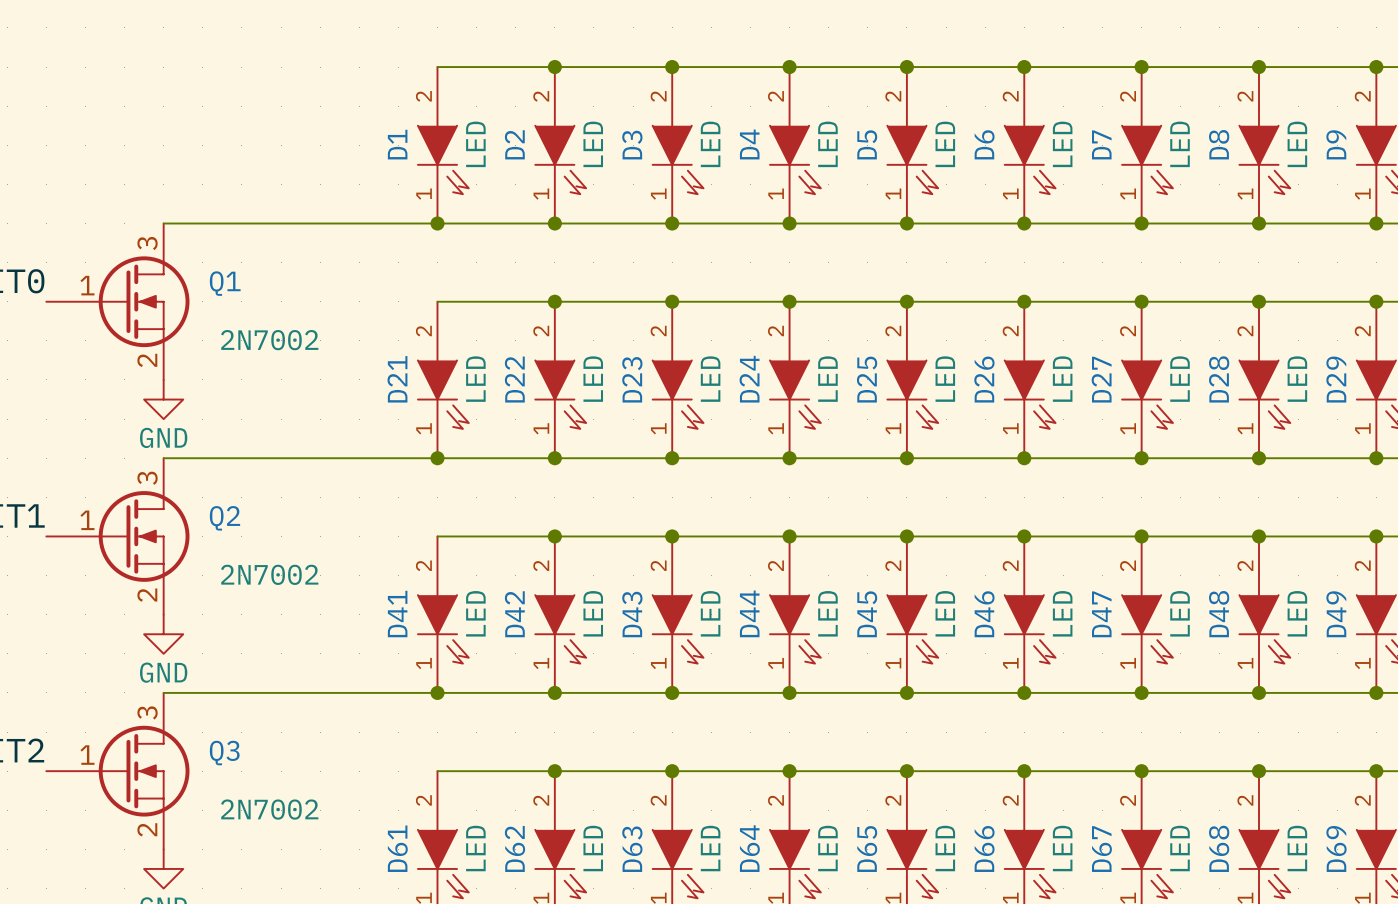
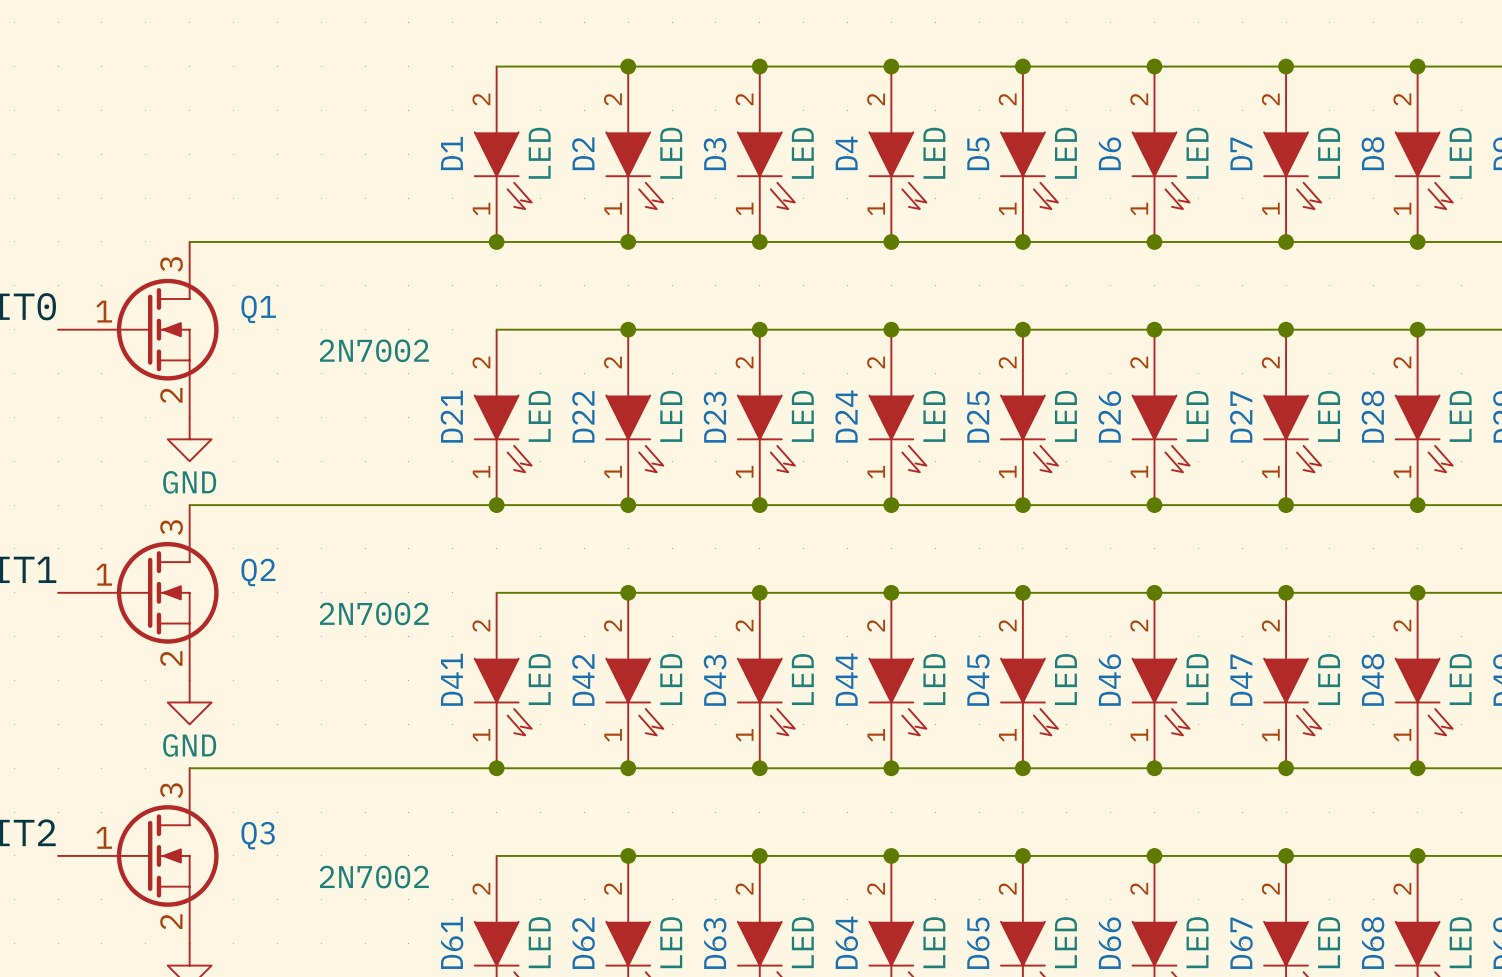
Q1 value position: 2N7002 (269, 340) -> 2N7002 (374, 350)
Q2 value position: 2N7002 (269, 574) -> 2N7002 (374, 613)
Q3 value position: 2N7002 (269, 809) -> 2N7002 (374, 877)

